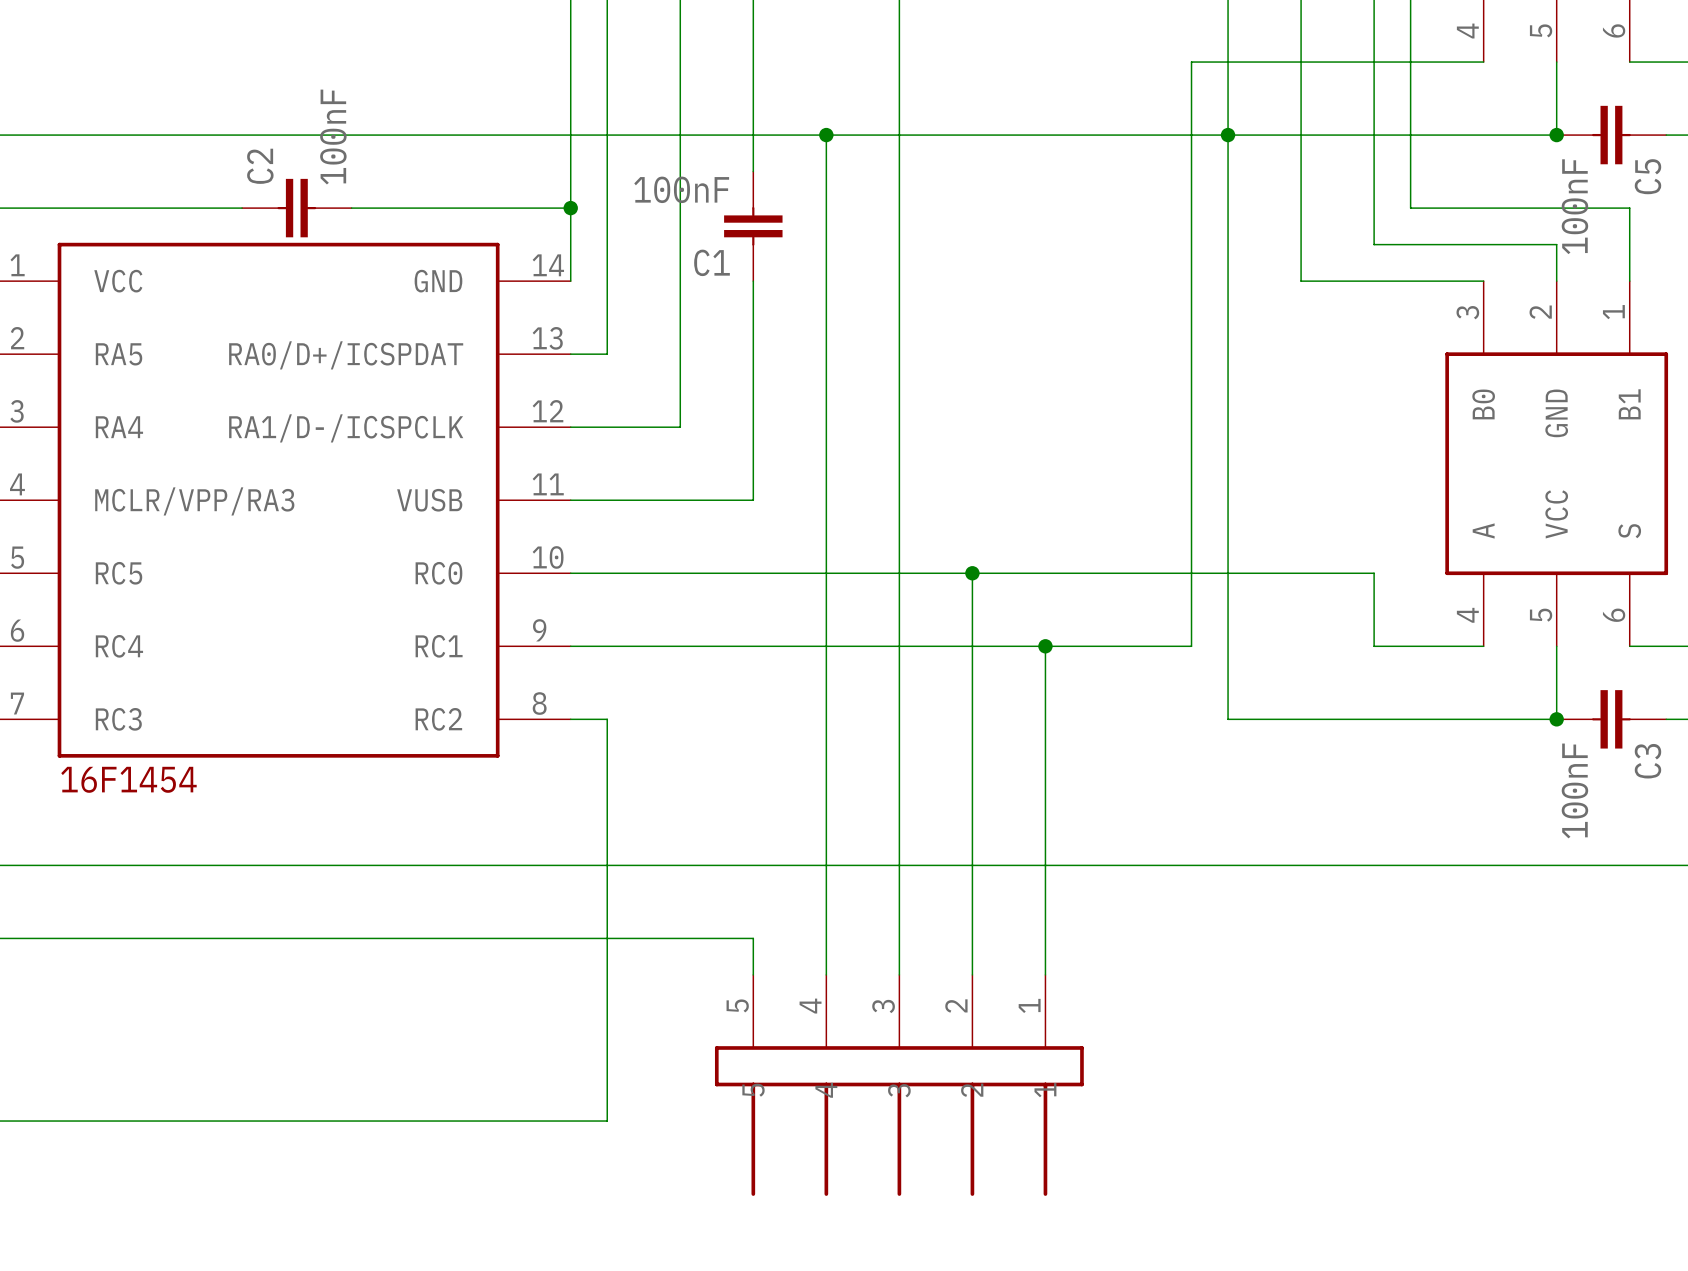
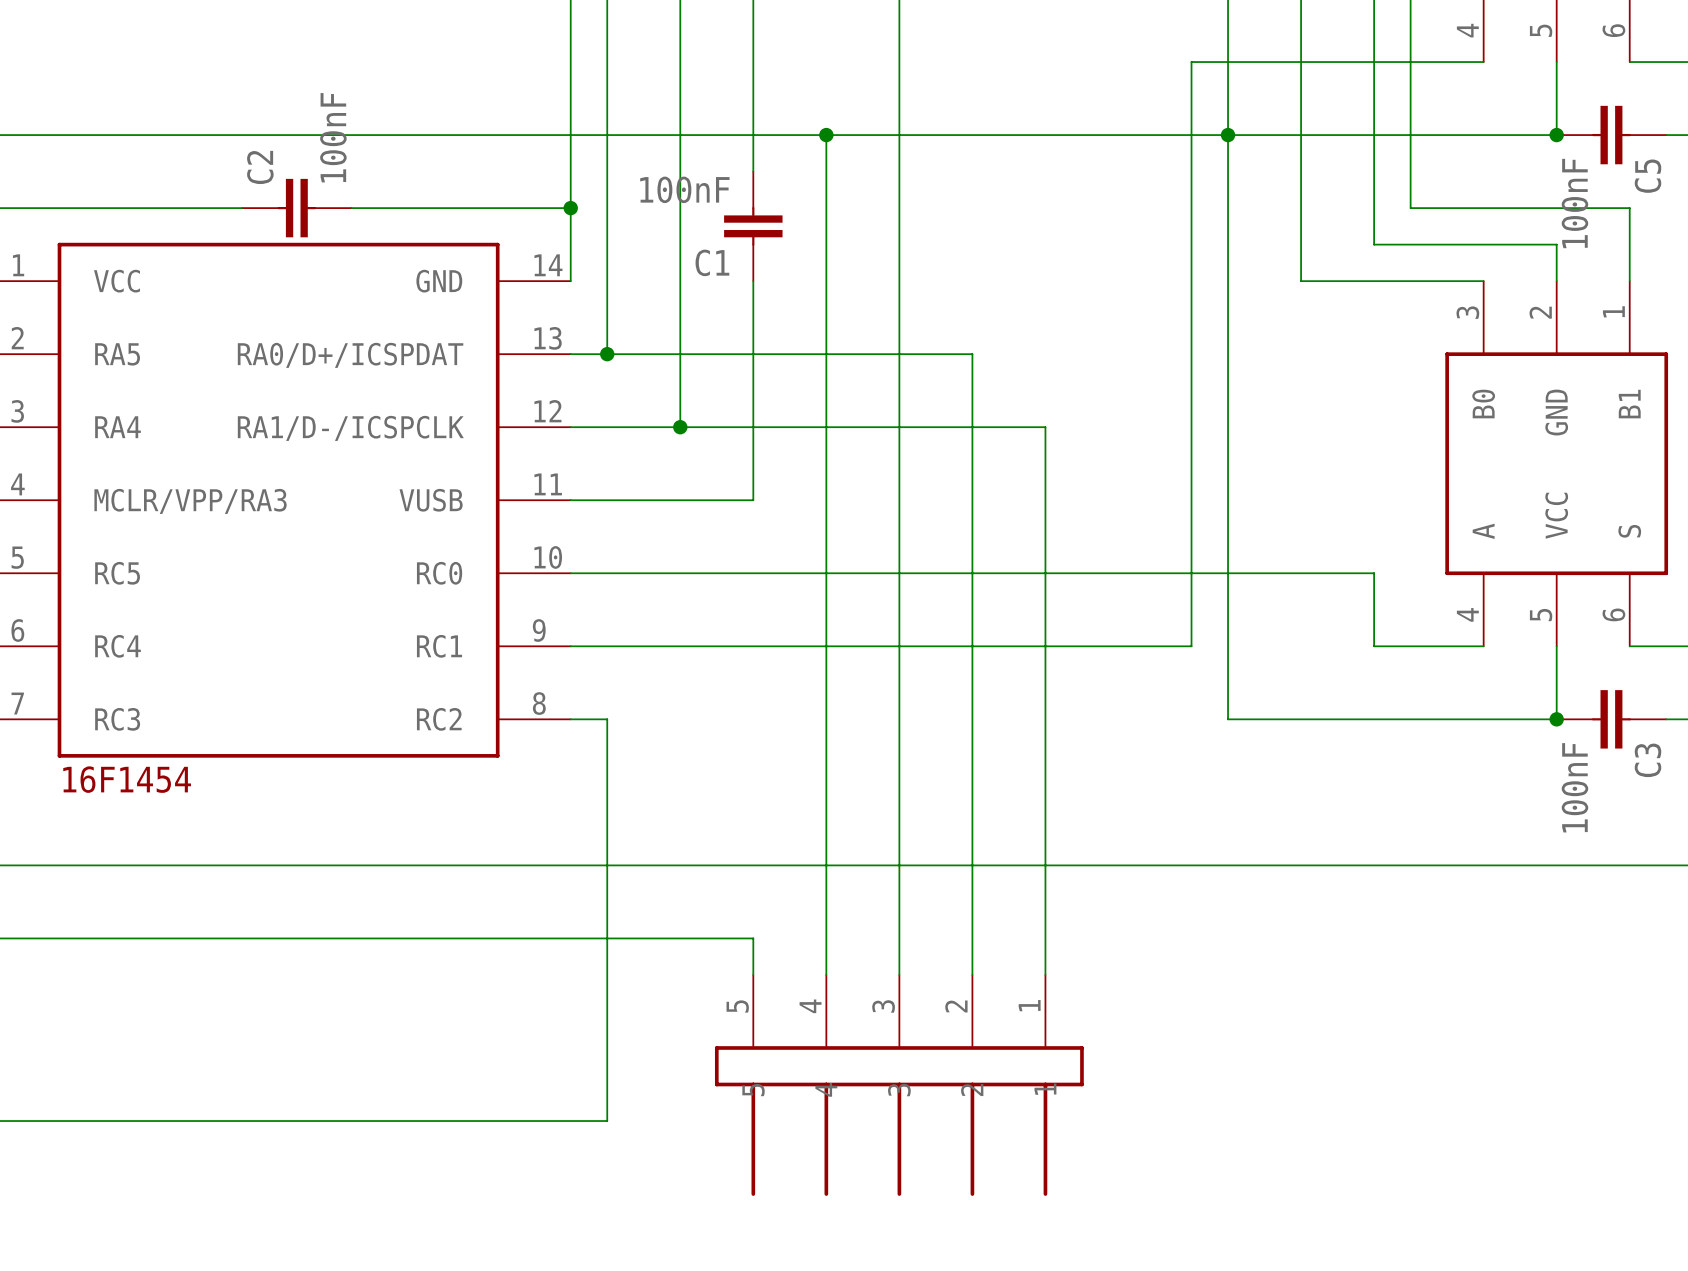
wire: none -> (607, 354) (972, 354) (972, 573)
junction: none -> (607, 354)
wire: none -> (680, 427) (1045, 427) (1045, 646)
junction: none -> (680, 427)
junction: (972, 573) -> none
junction: (1045, 646) -> none

